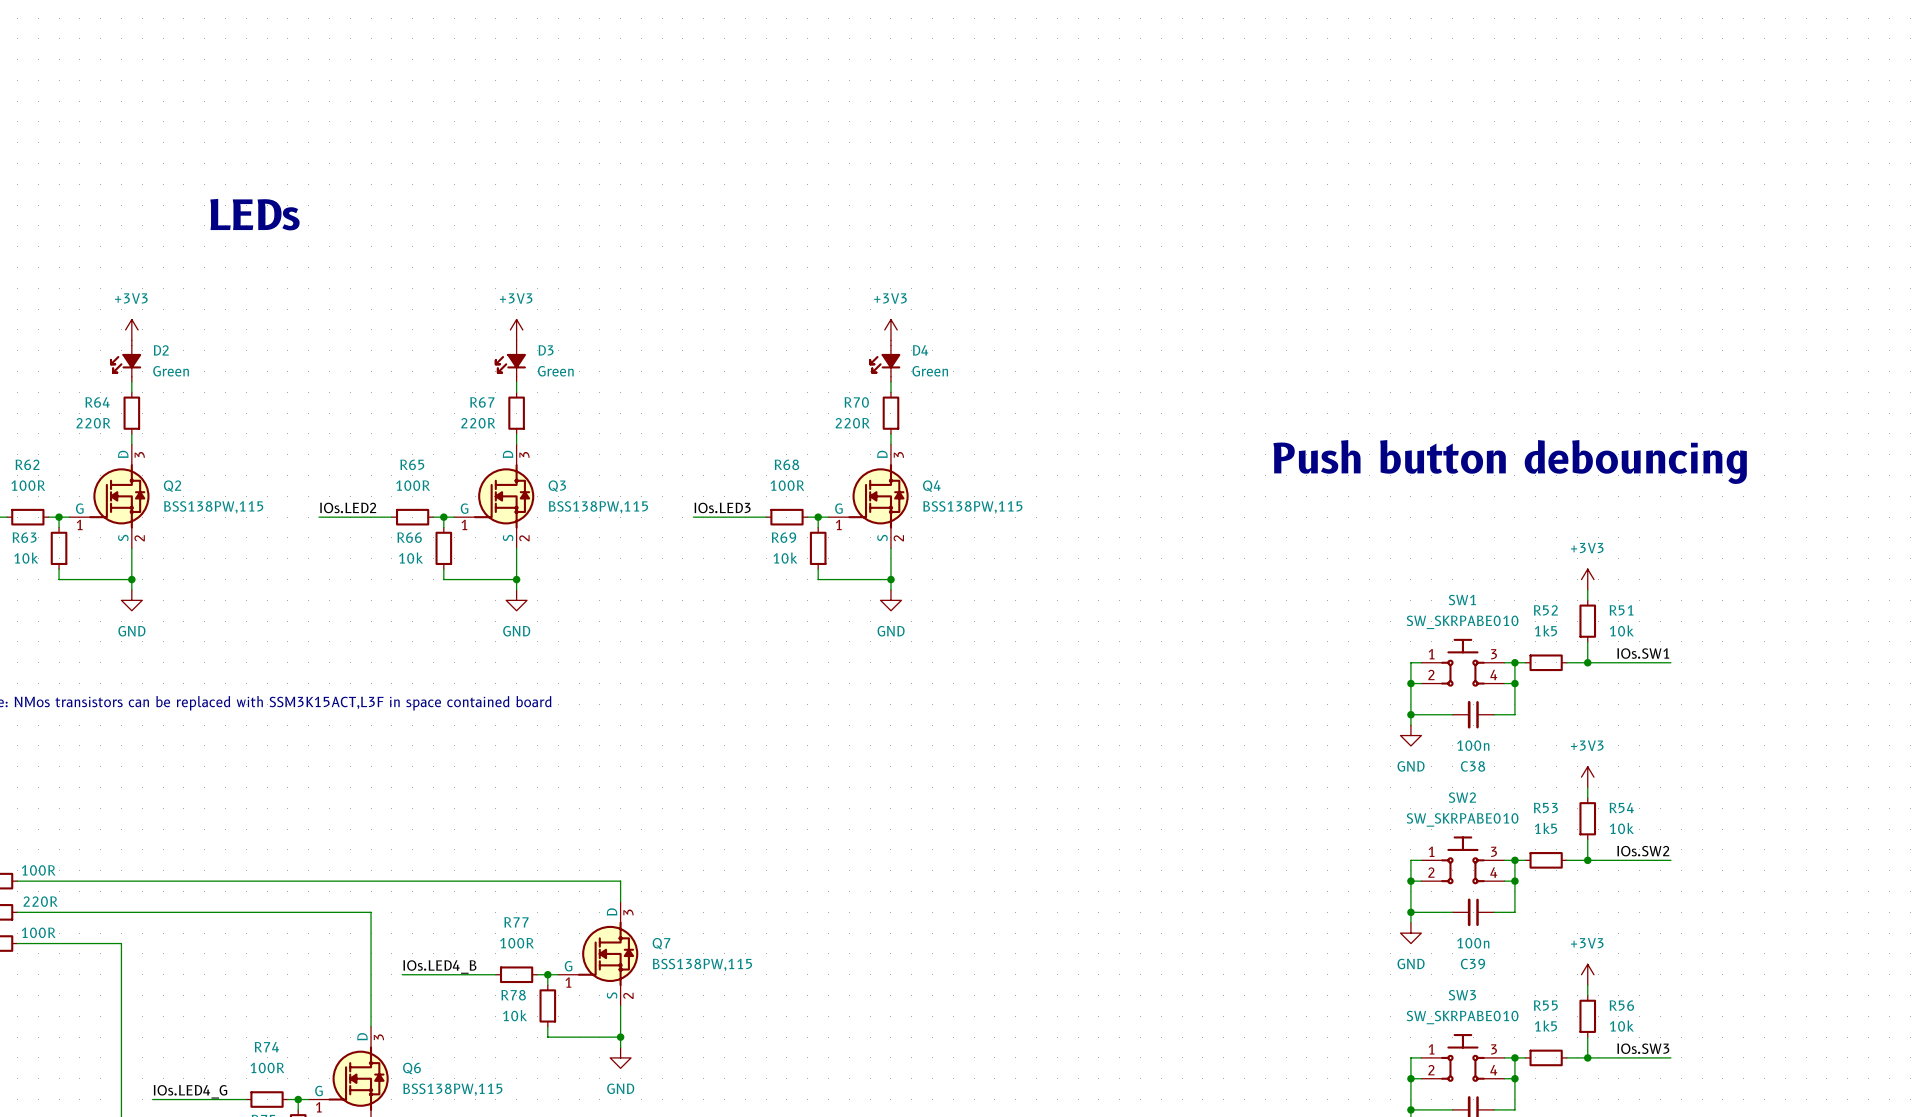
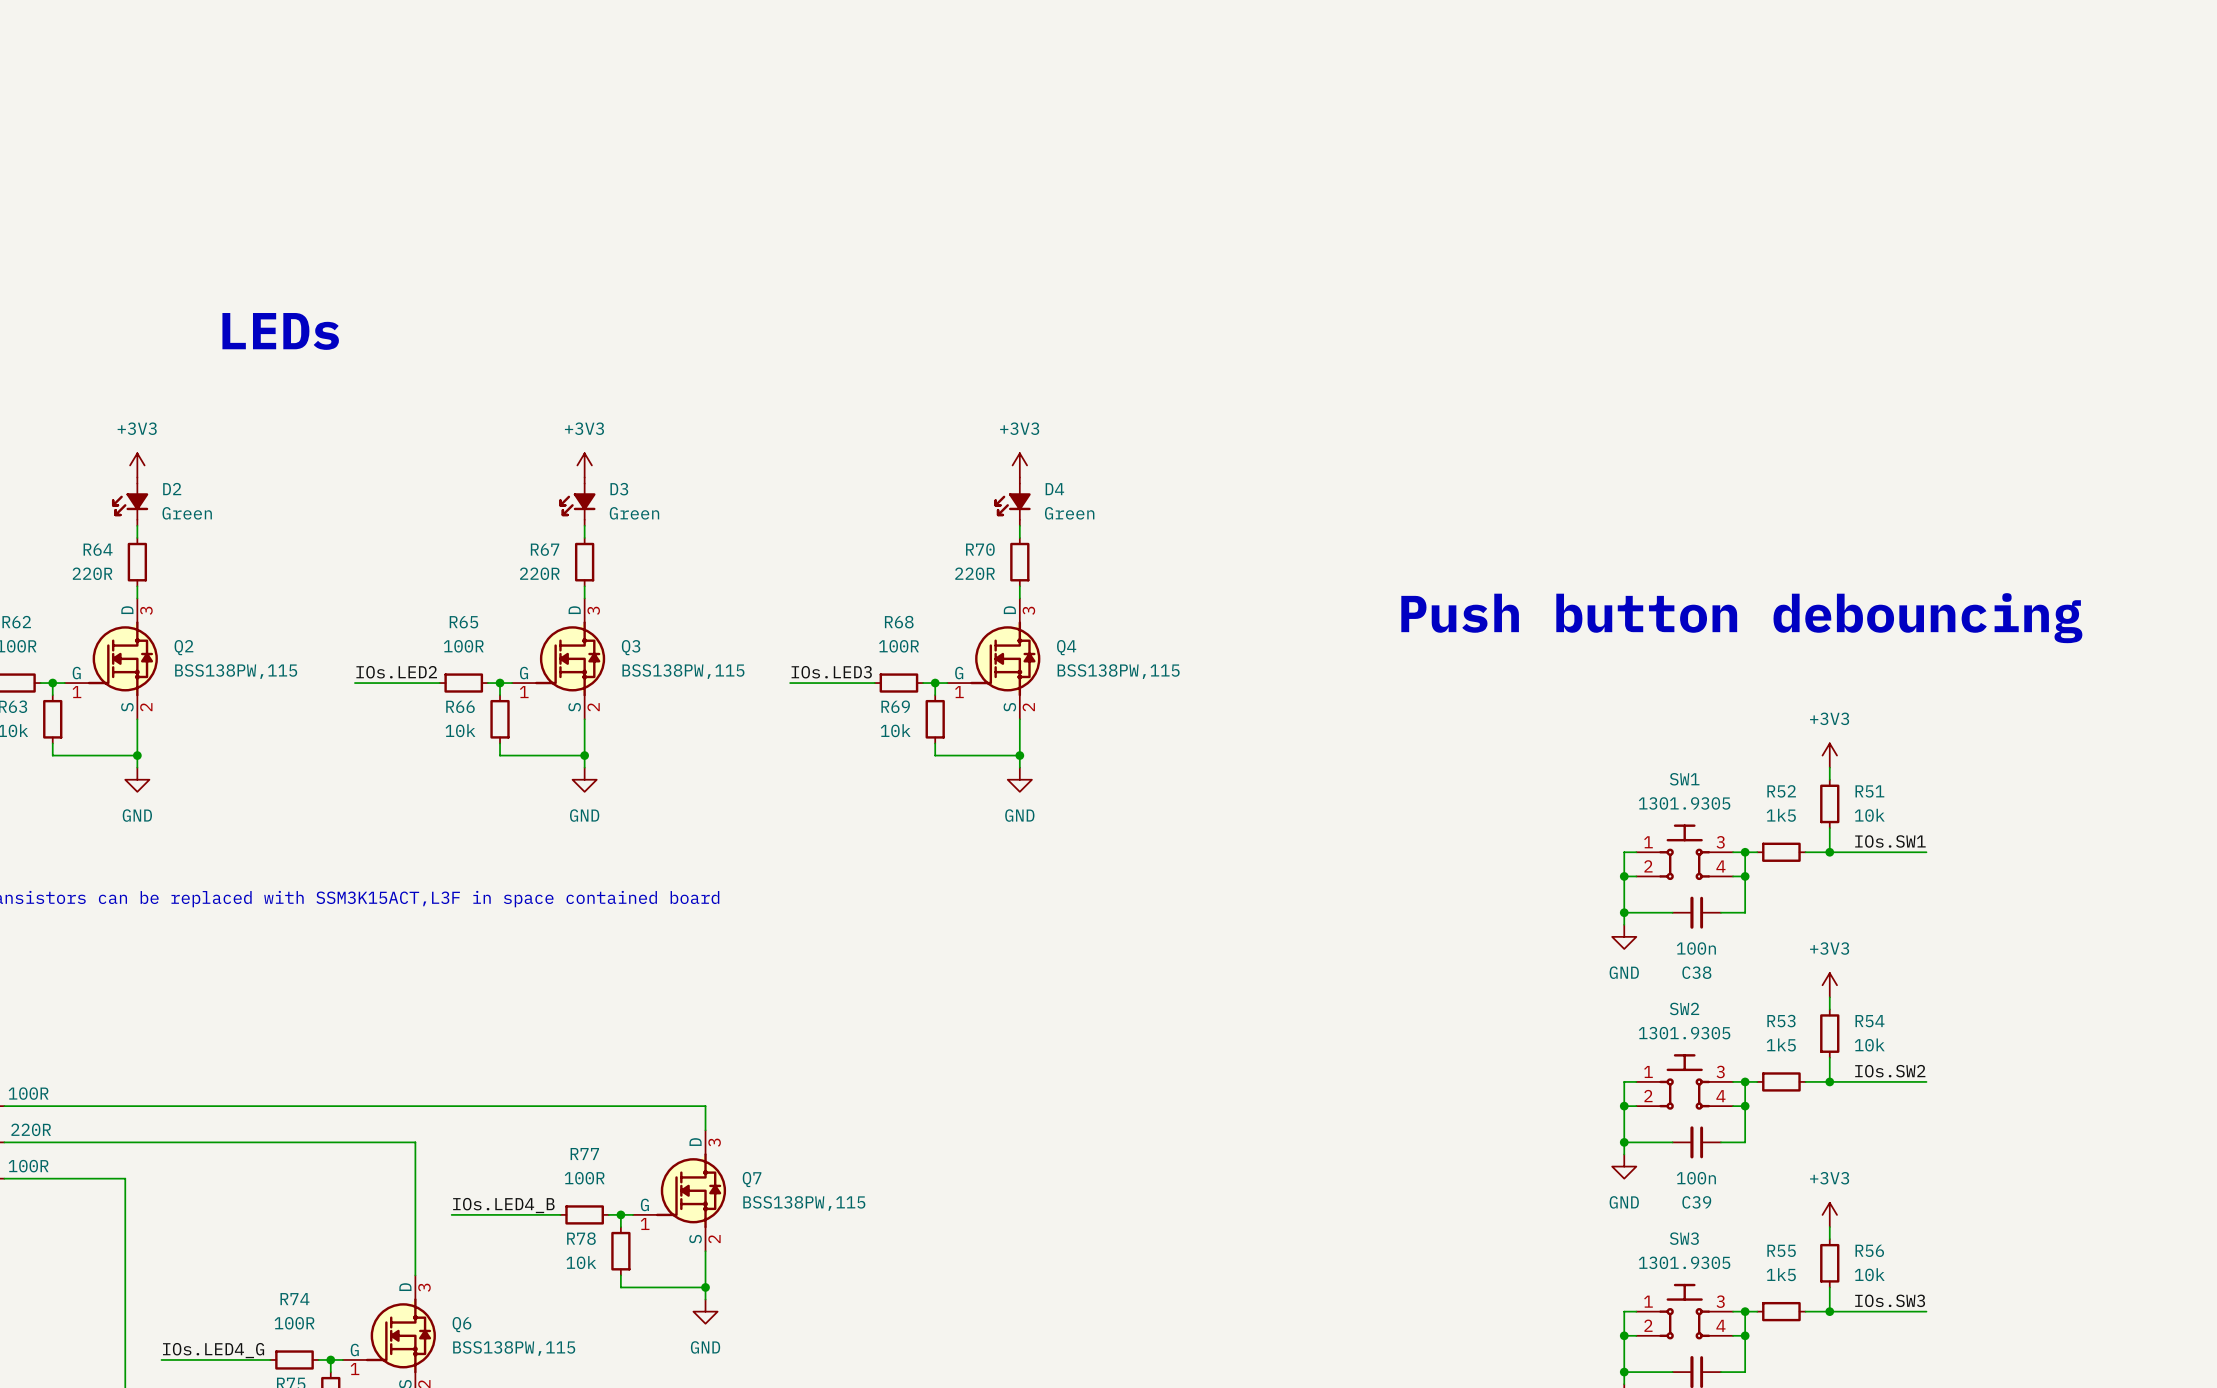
SW1 text: none -> 1301.9305 (1684, 803)
SW1 value: SW_SKRPABE010 (1462, 622) -> none
SW2 text: none -> 1301.9305 (1684, 1033)
SW2 value: SW_SKRPABE010 (1462, 819) -> none
SW3 text: none -> 1301.9305 (1684, 1262)
SW3 value: SW_SKRPABE010 (1462, 1017) -> none

